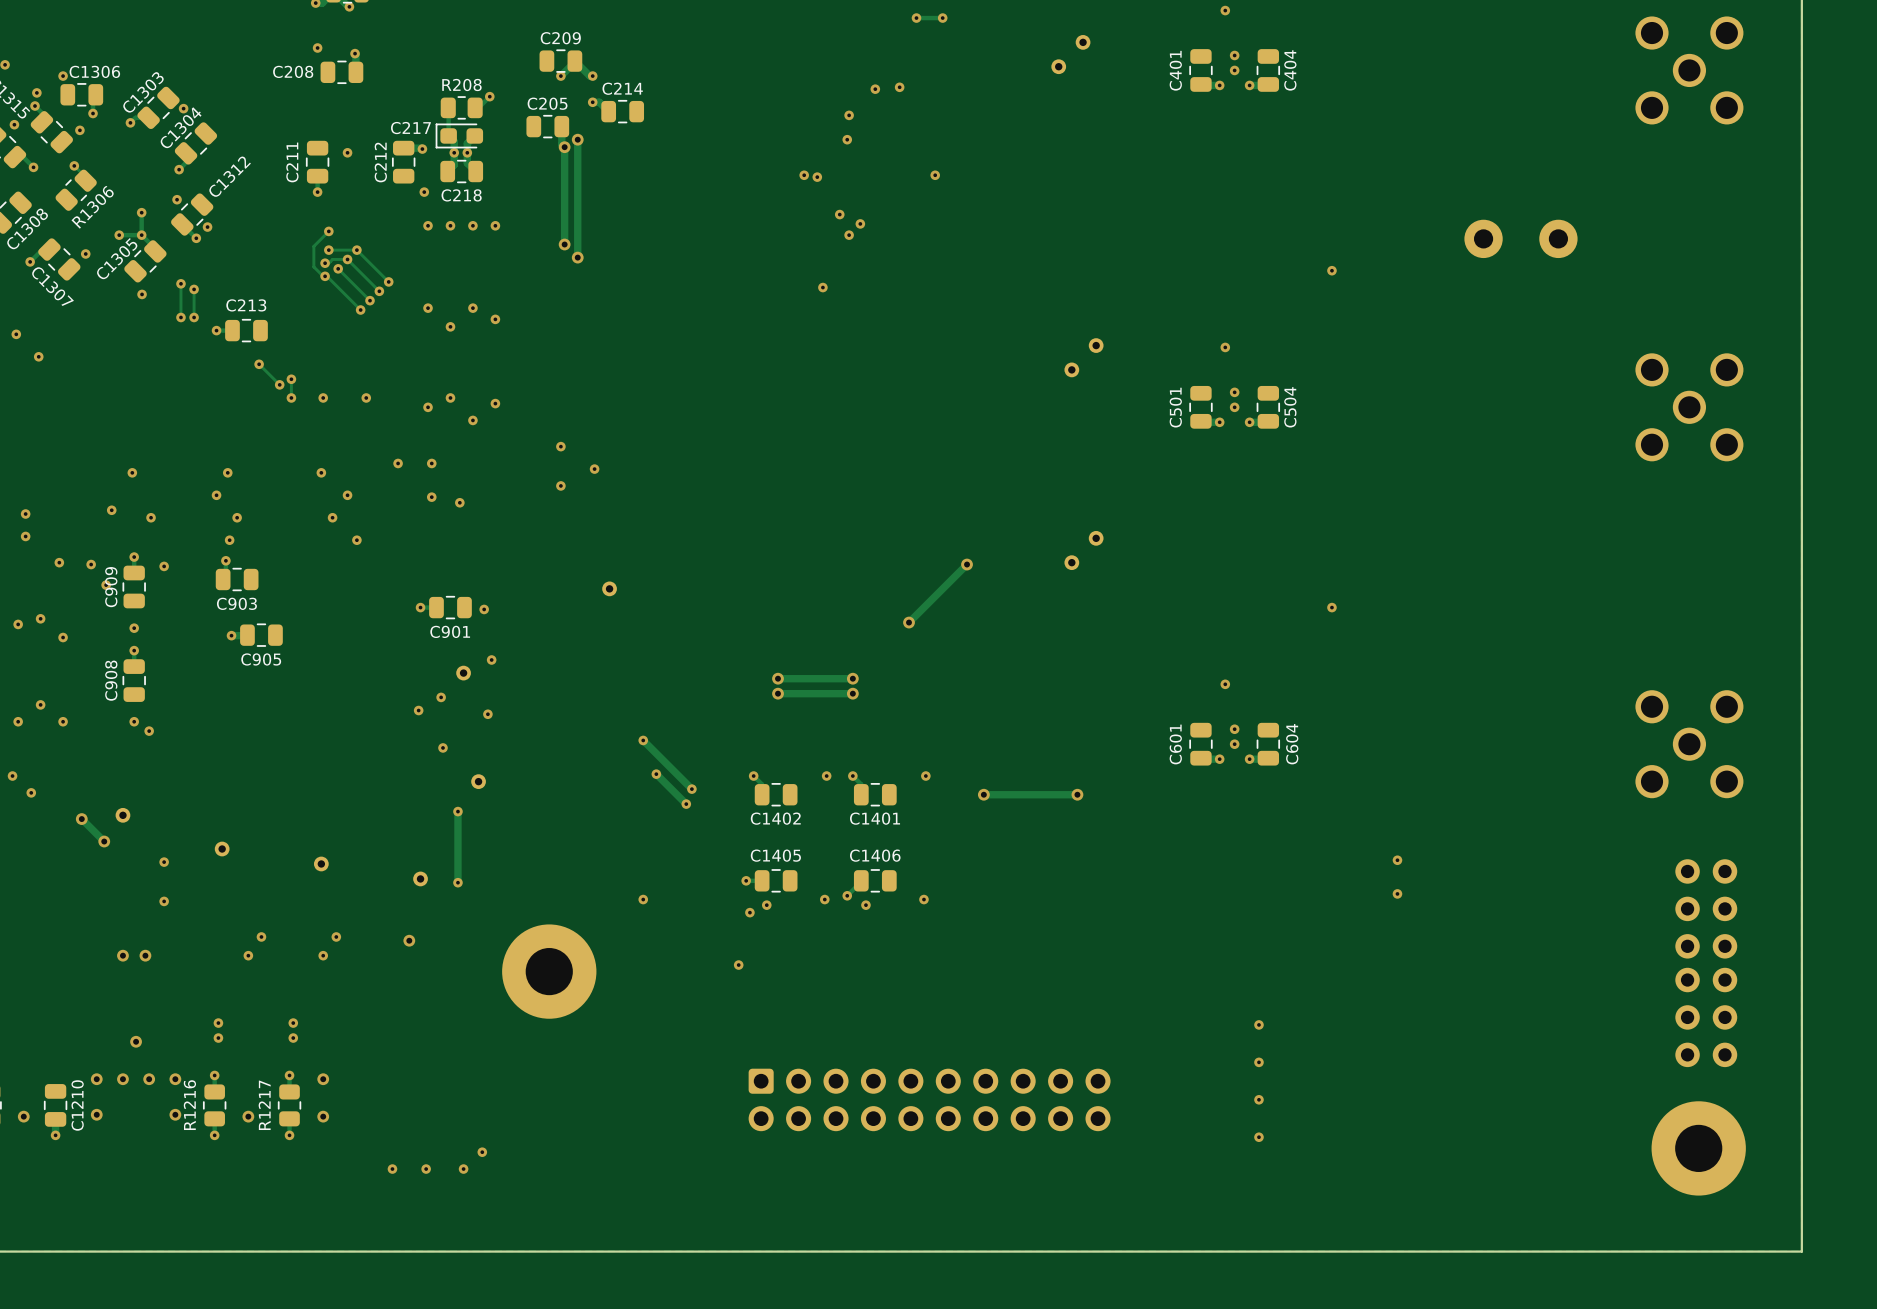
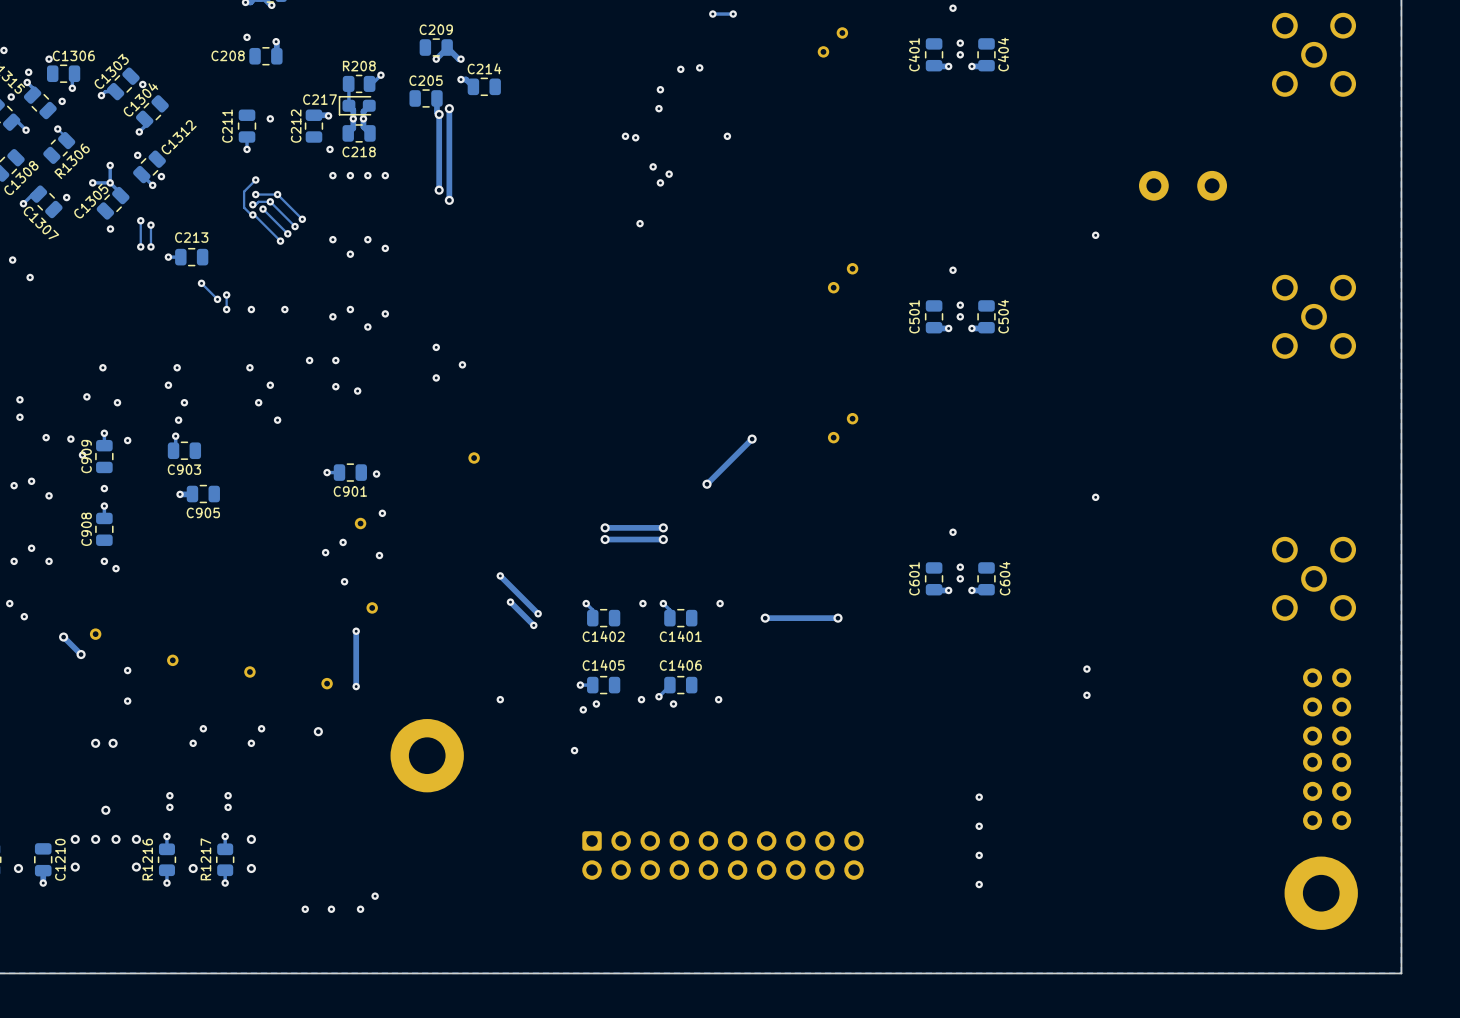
via position: (1331, 270) -> (1095, 235)
via position: (1331, 607) -> (1095, 497)

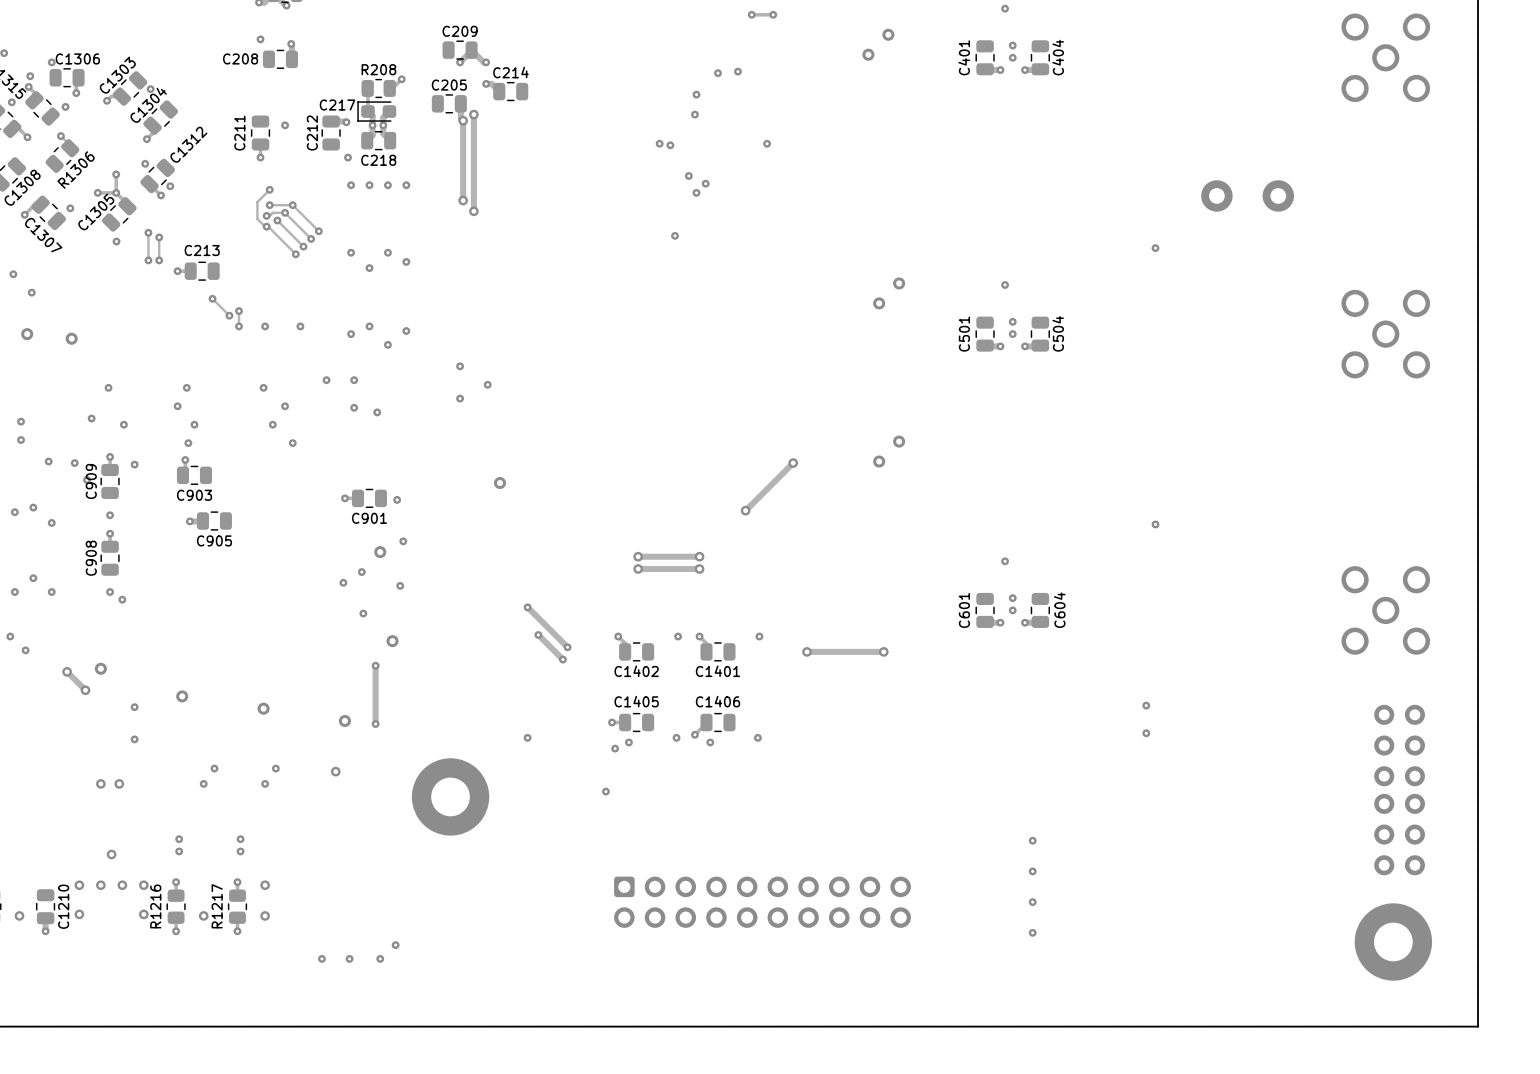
part: none -> (27, 334)
part: none -> (71, 338)

